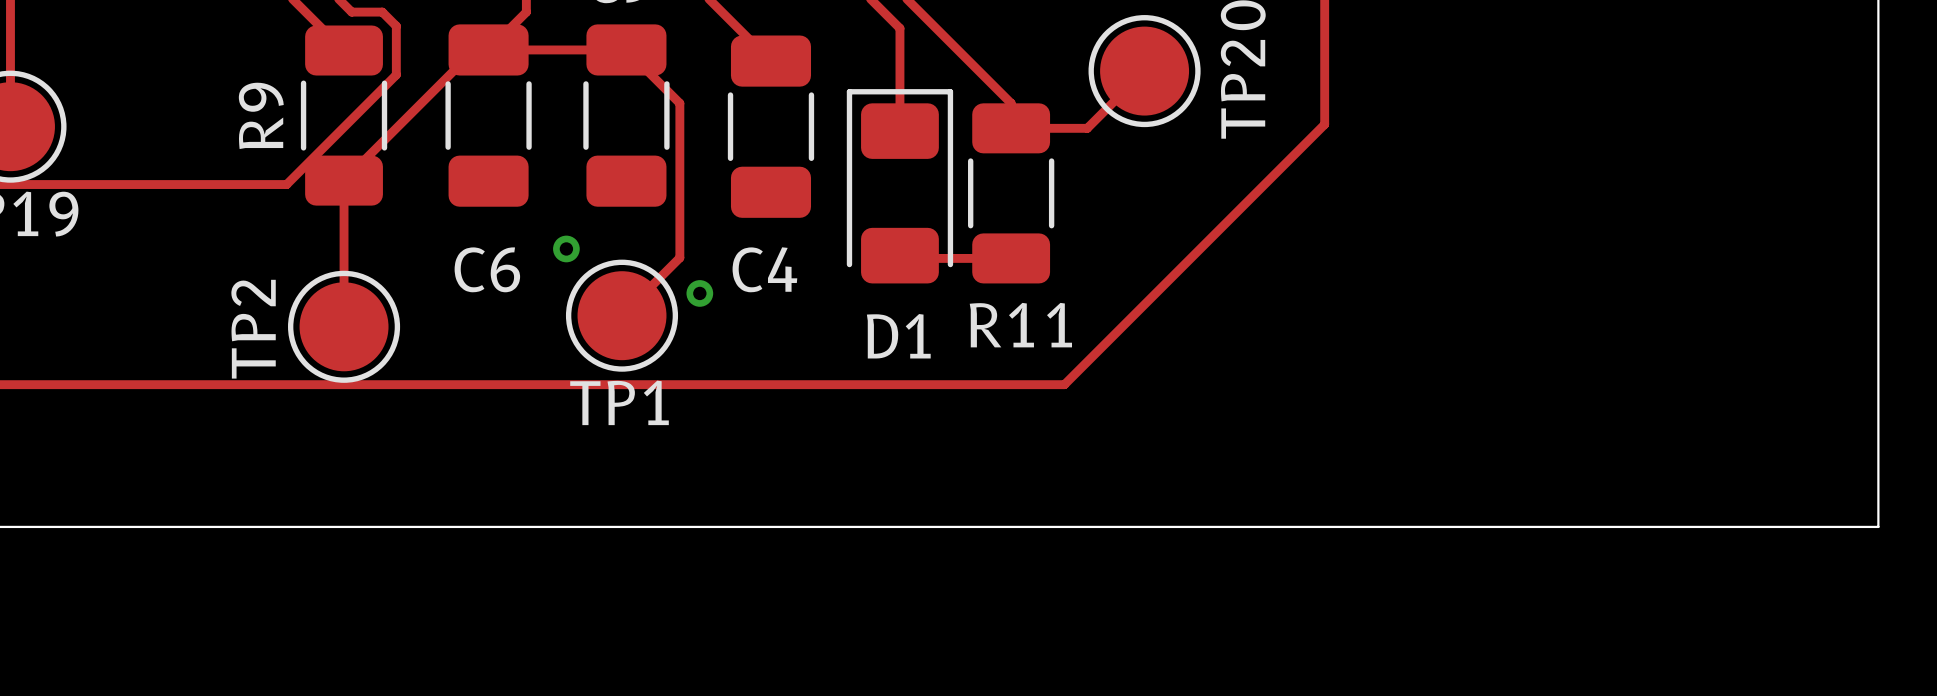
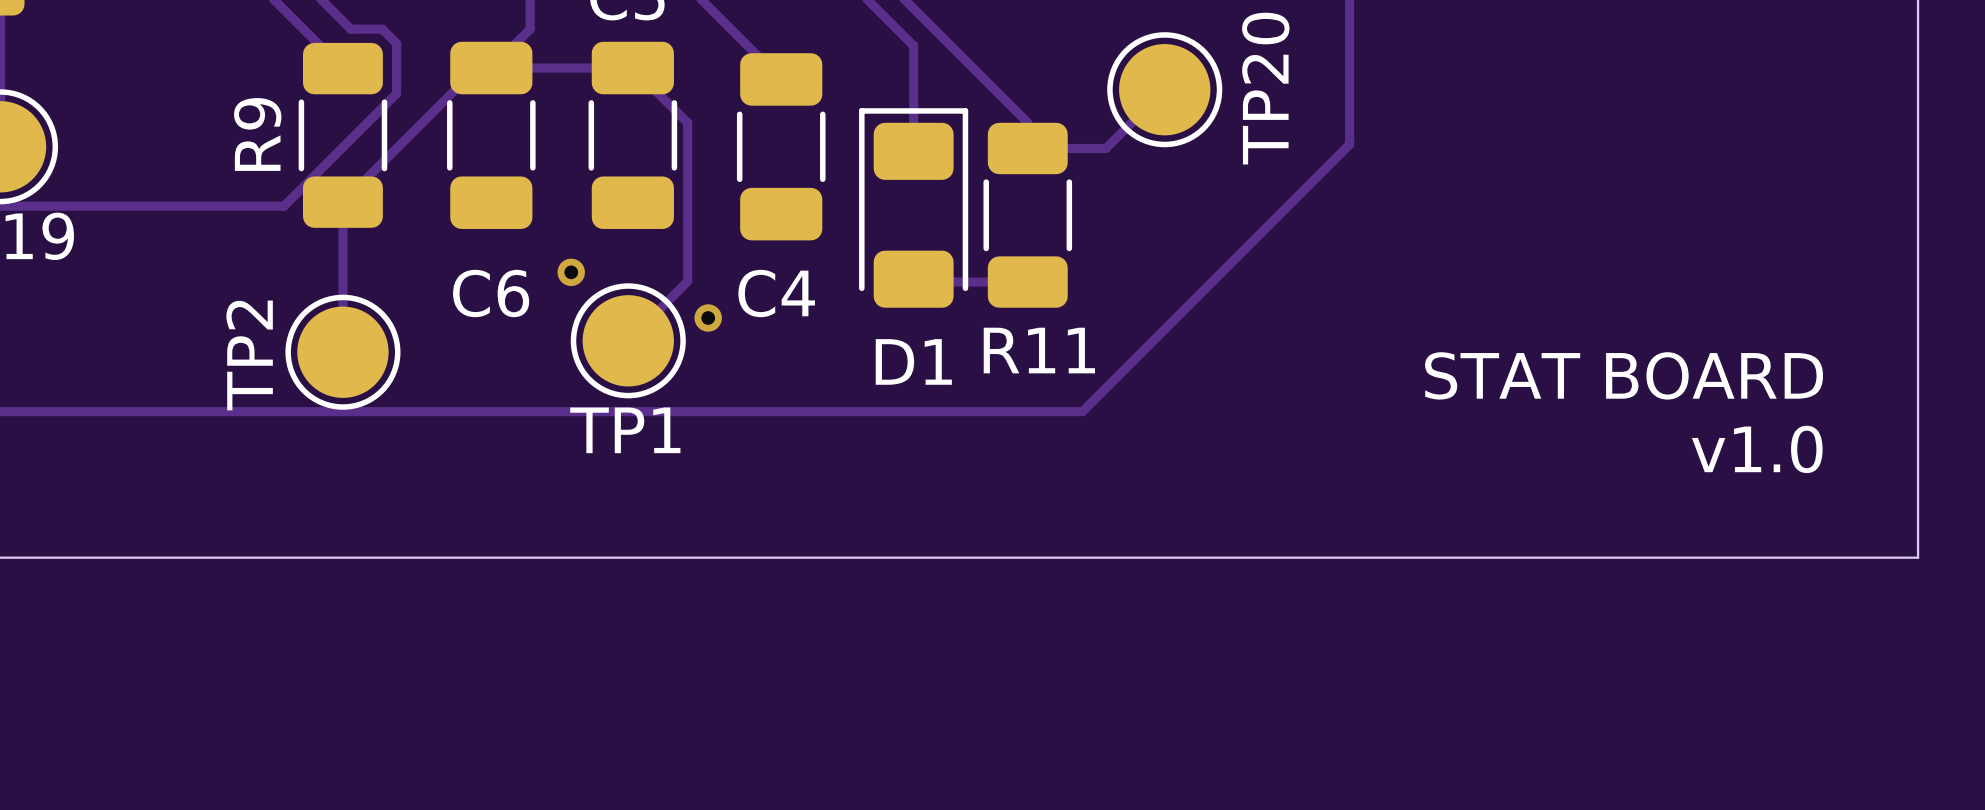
text: none -> STAT BOARD (1624, 375)
text: none -> v1.0 (1757, 449)

